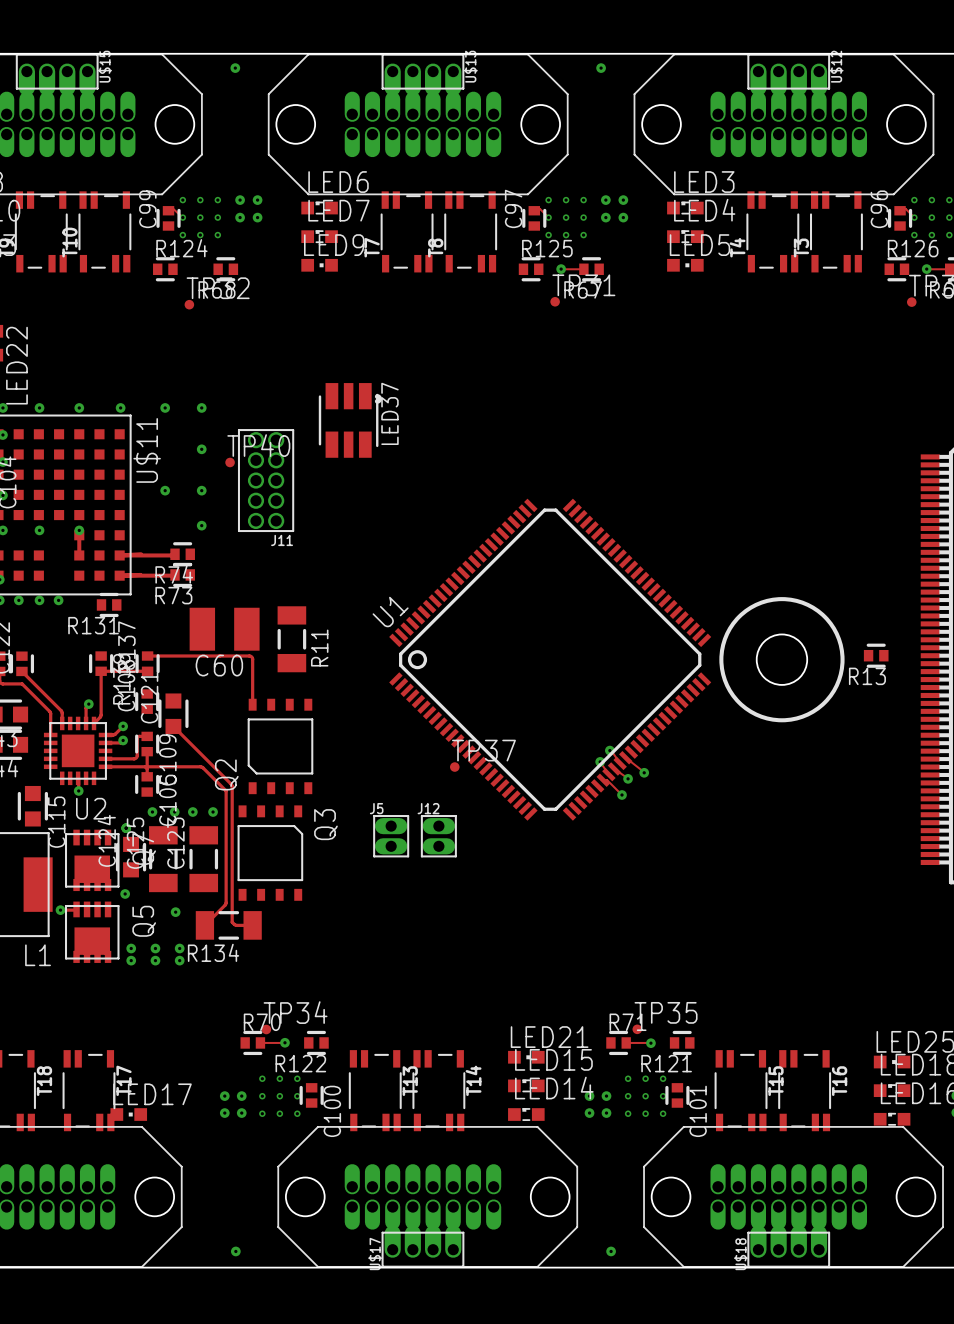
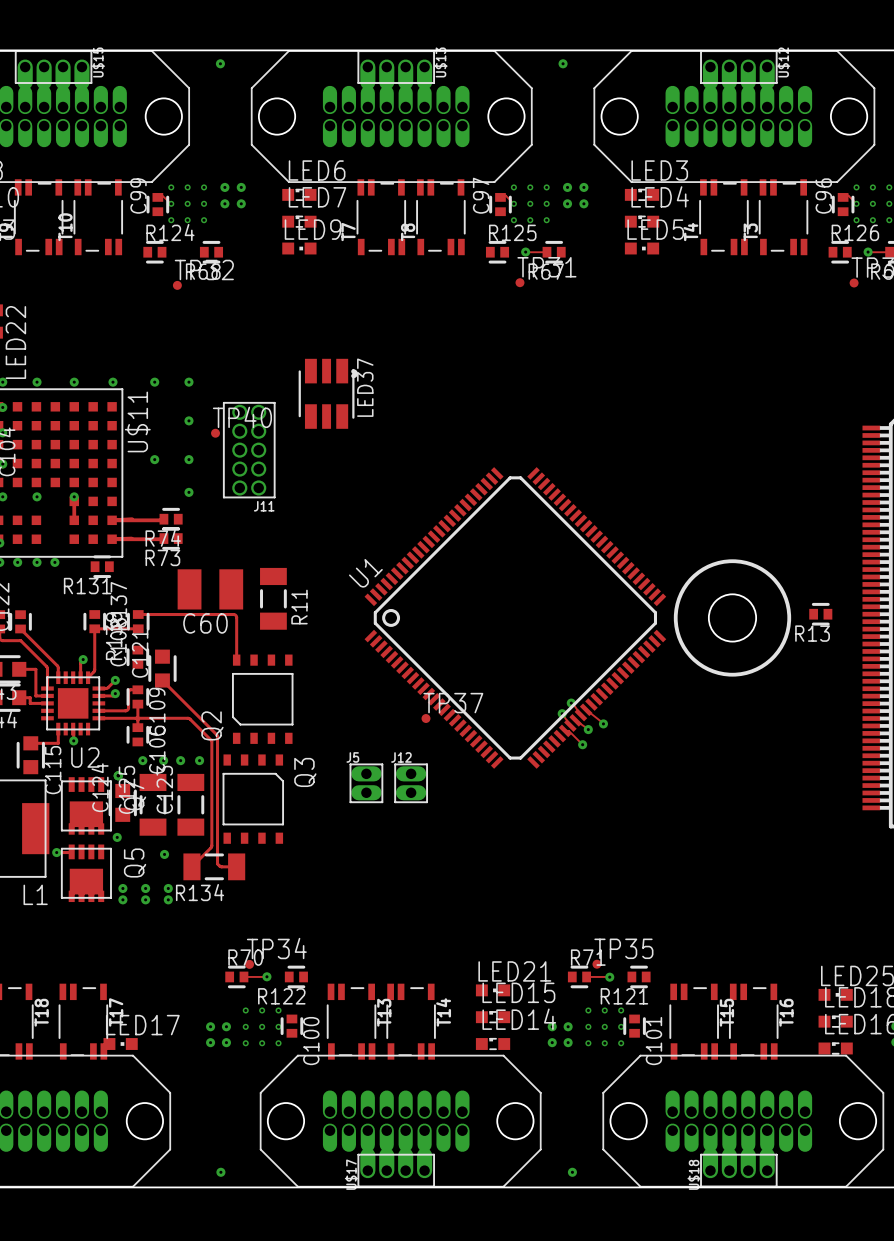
track: none -> (19, 669) (35, 669) (35, 695) (47, 695)
track: none -> (19, 697) (30, 697) (30, 703) (47, 703)
track: none -> (58, 729) (58, 743) (30, 743)

